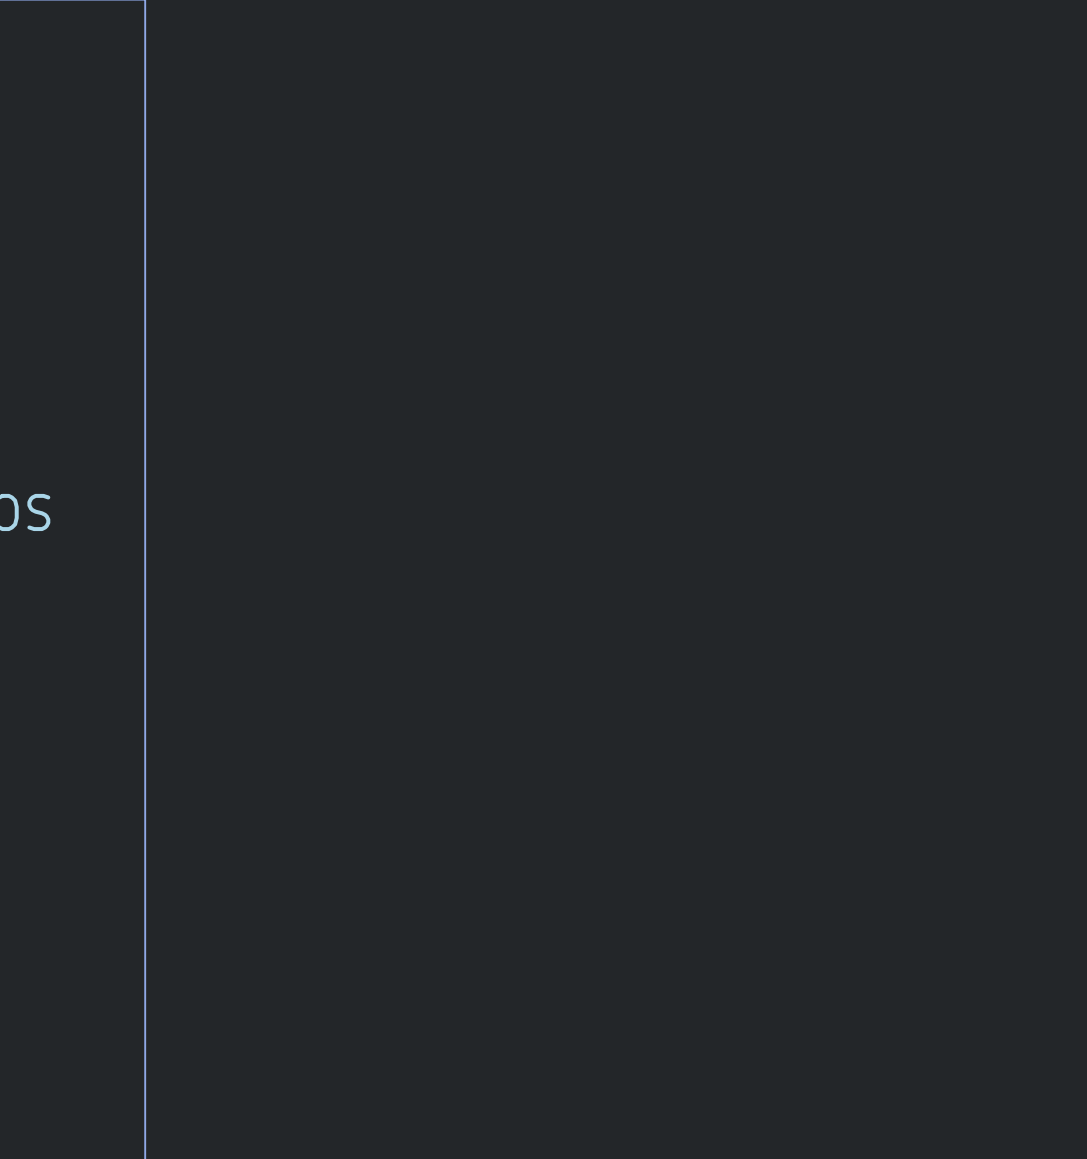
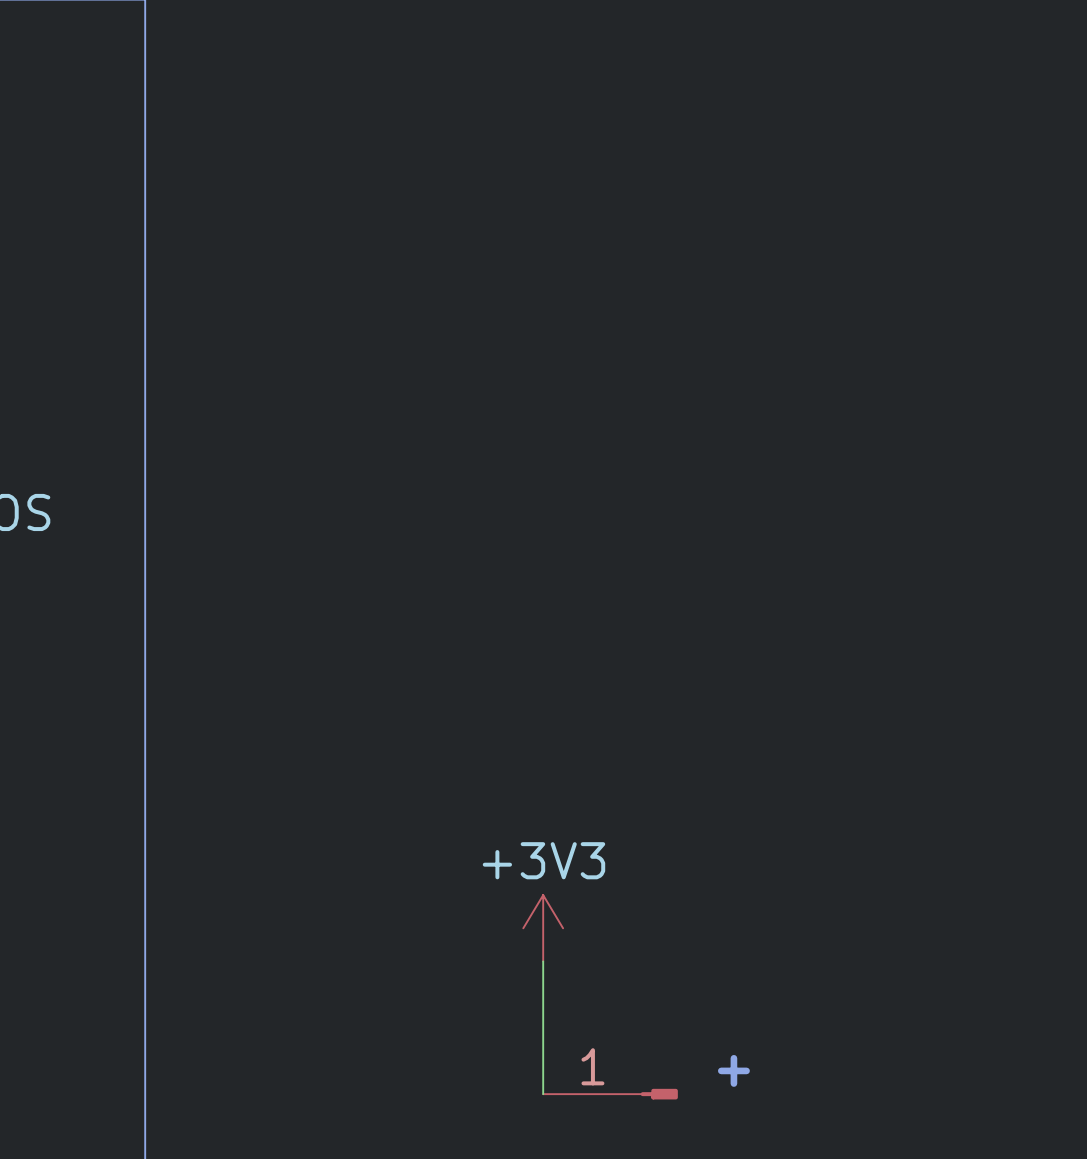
power symbol: none -> +3V3 (543, 928)
wire: none -> (543, 961) (543, 1094)
text: none -> + (733, 1070)
part: none -> (610, 1094)

